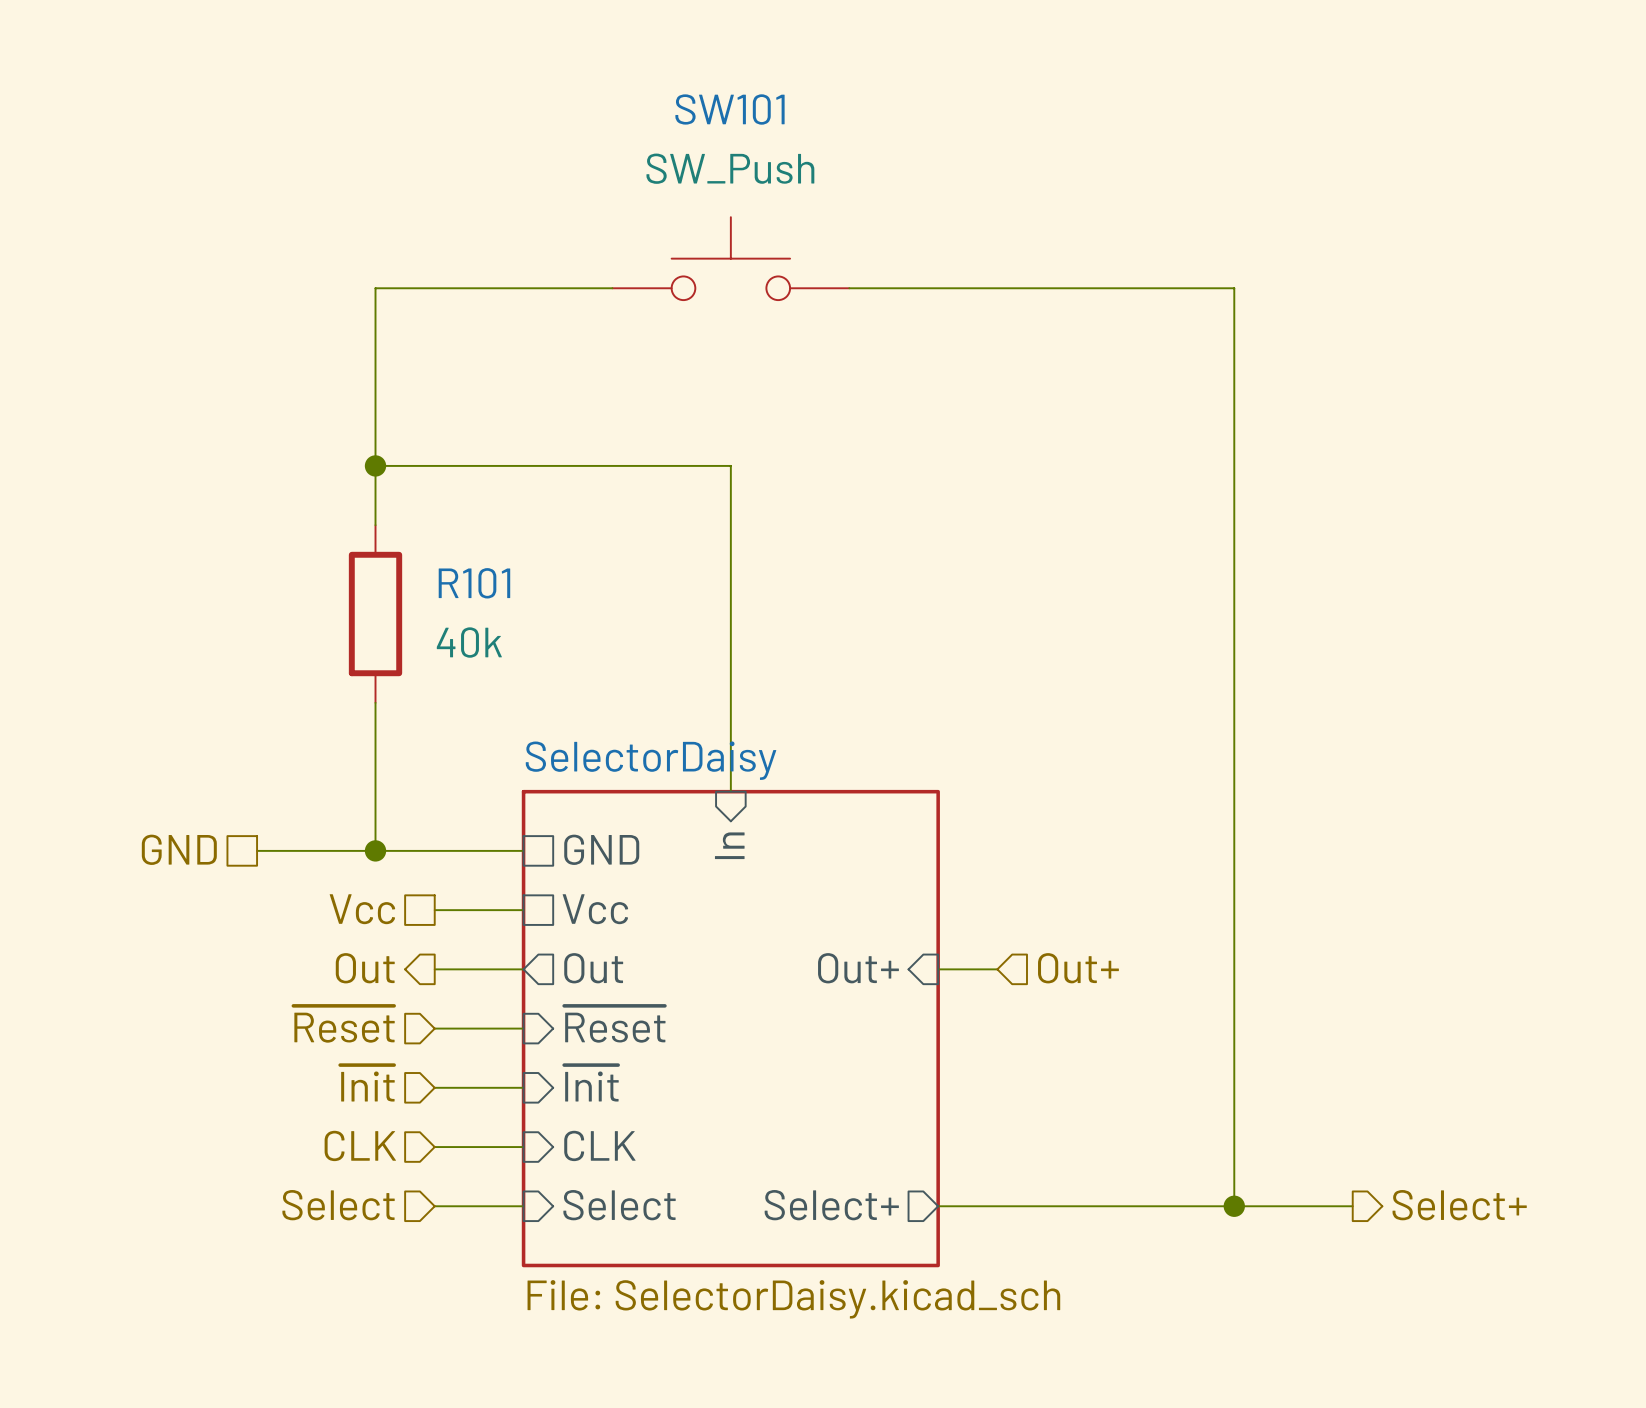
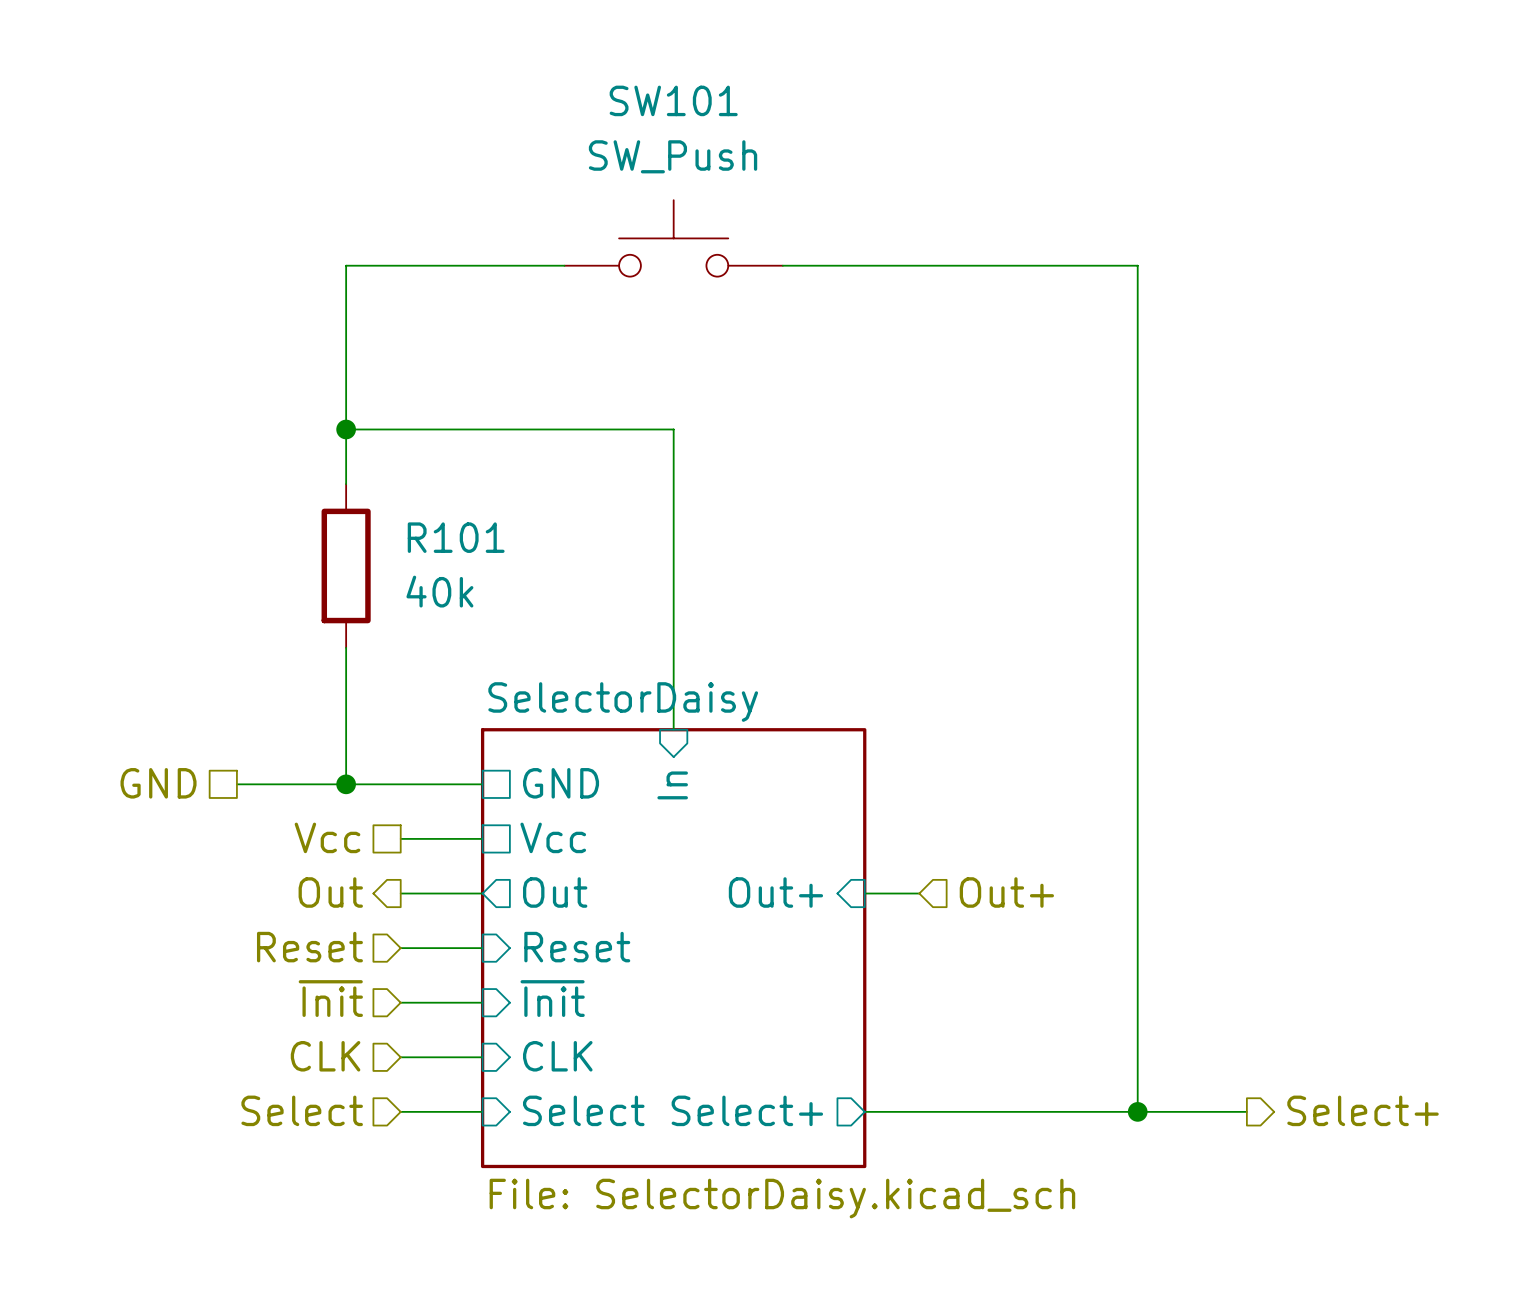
hierarchical label: ~{Reset} (344, 1024) -> Reset (309, 947)
sheet pin: ~{Reset} (614, 1024) -> Reset (577, 947)

